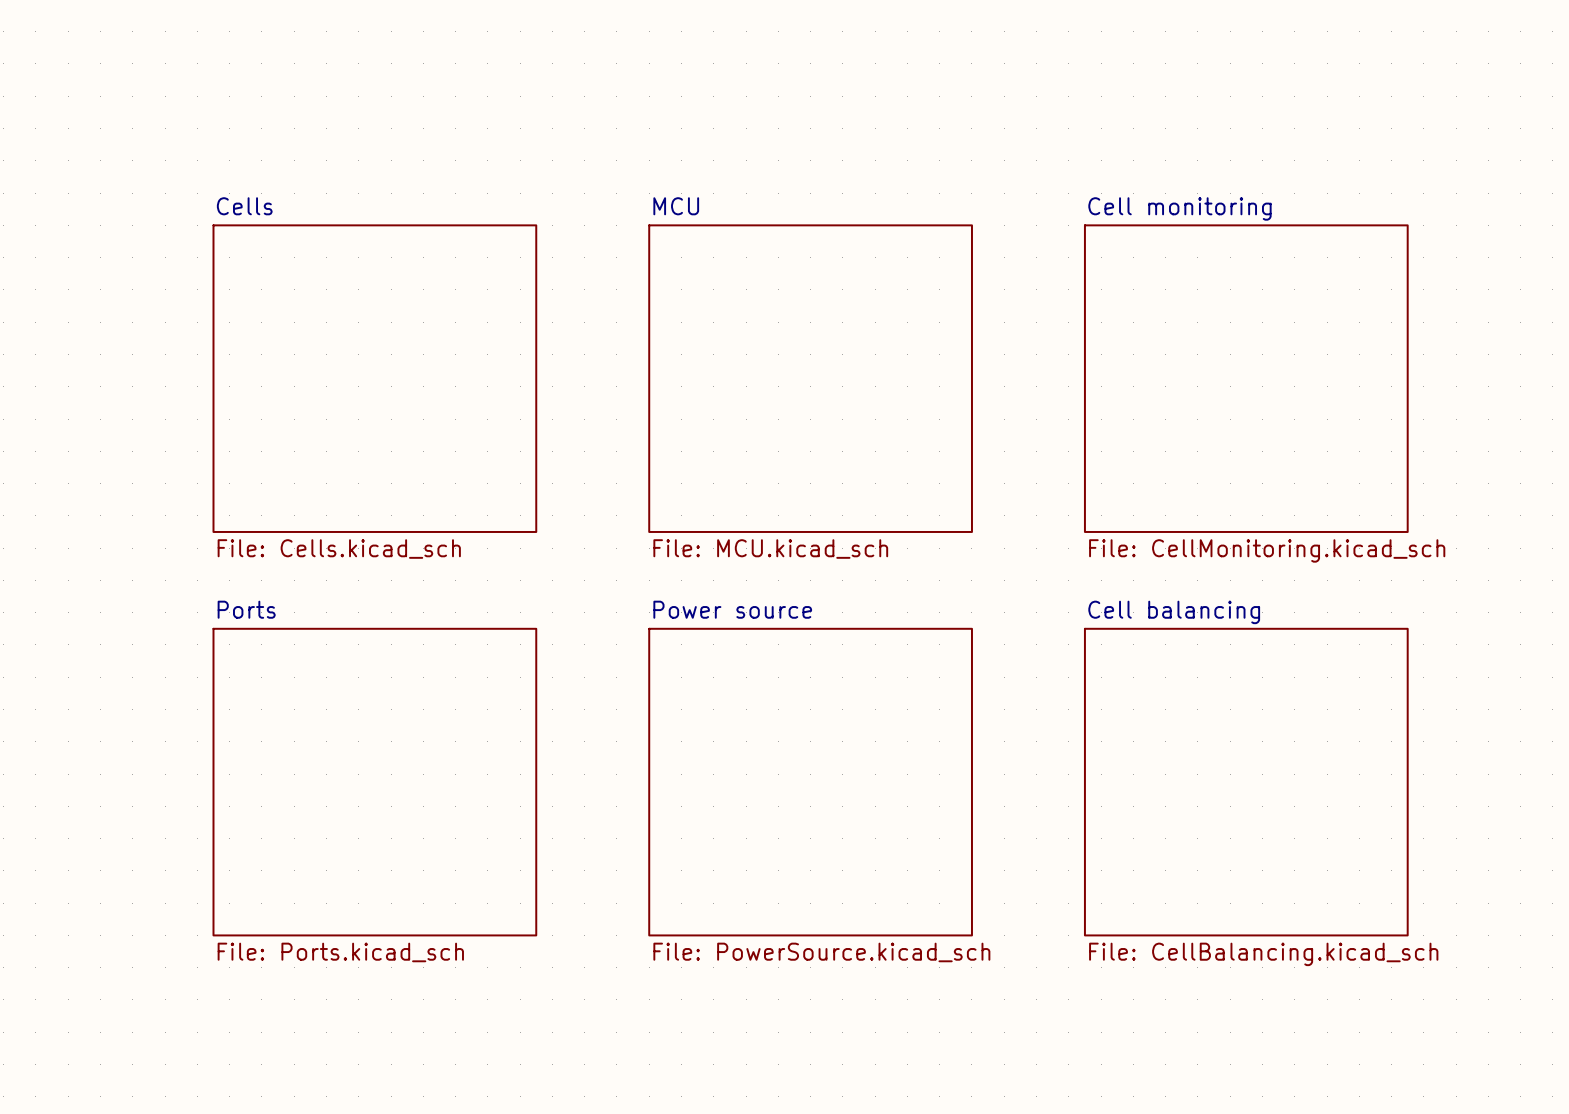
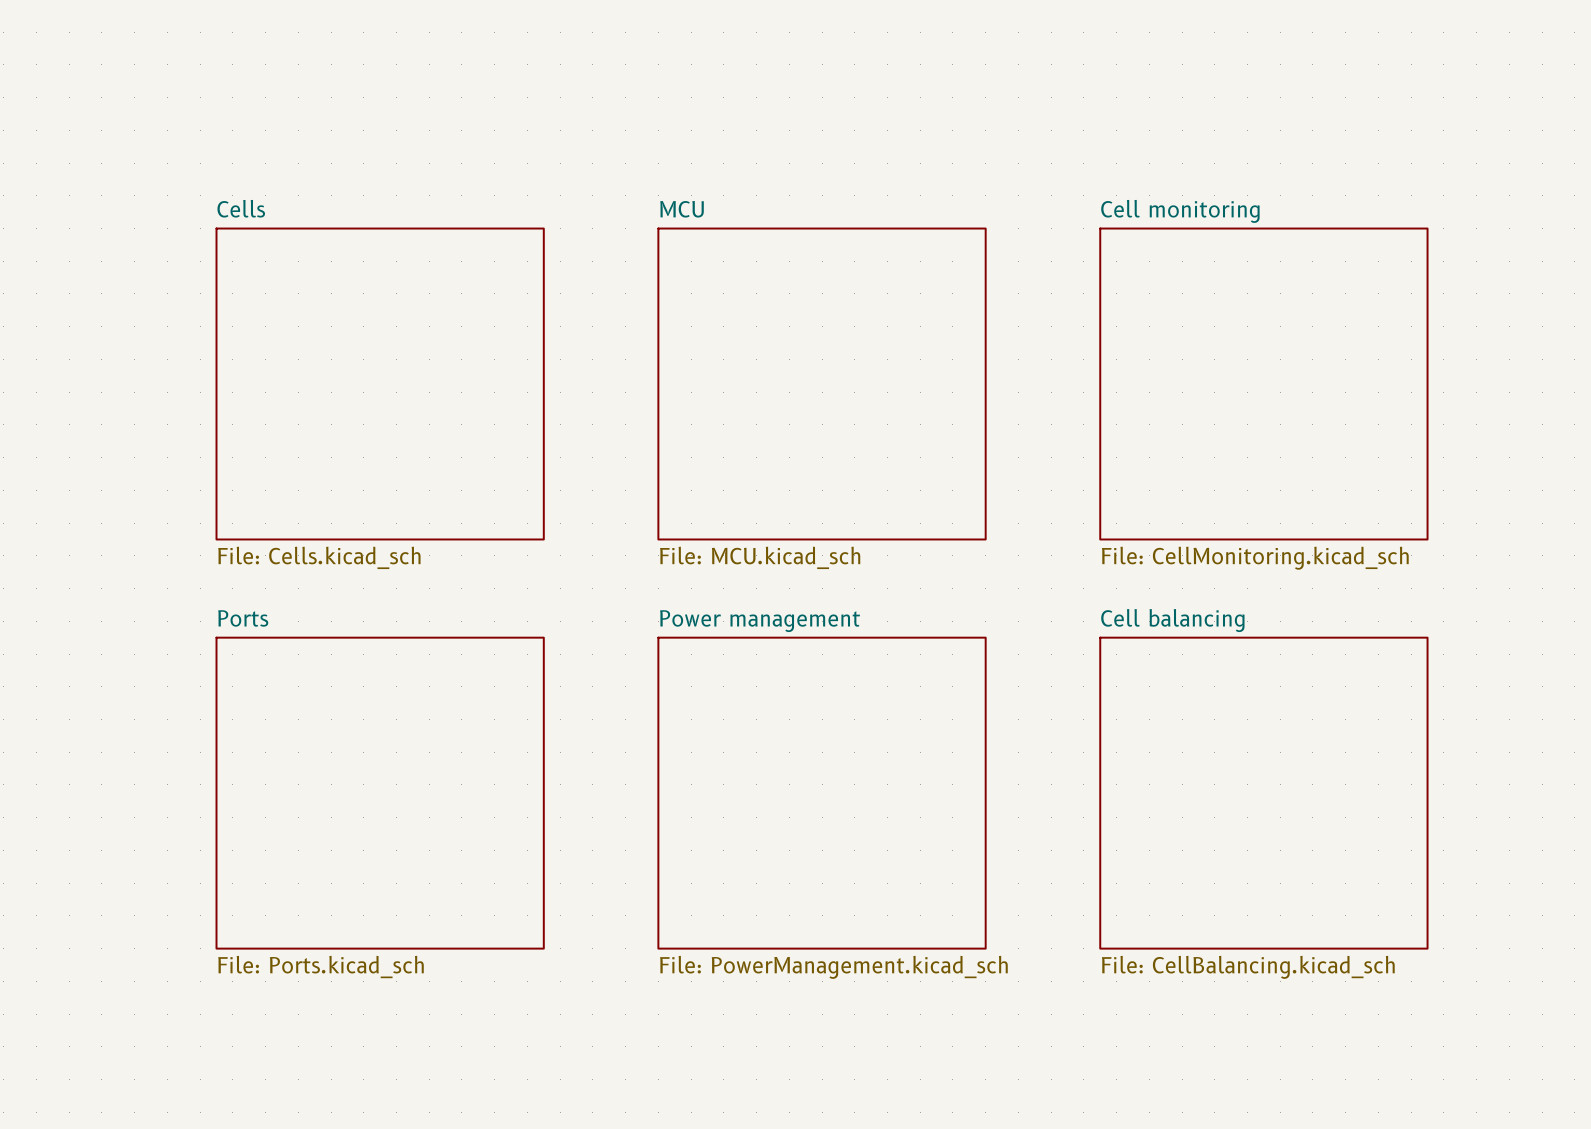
sheet Power source name: Power source (732, 609) -> Power management (760, 621)
sheet Power source value: File: PowerSource.kicad_sch (821, 952) -> File: PowerManagement.kicad_sch (833, 967)

